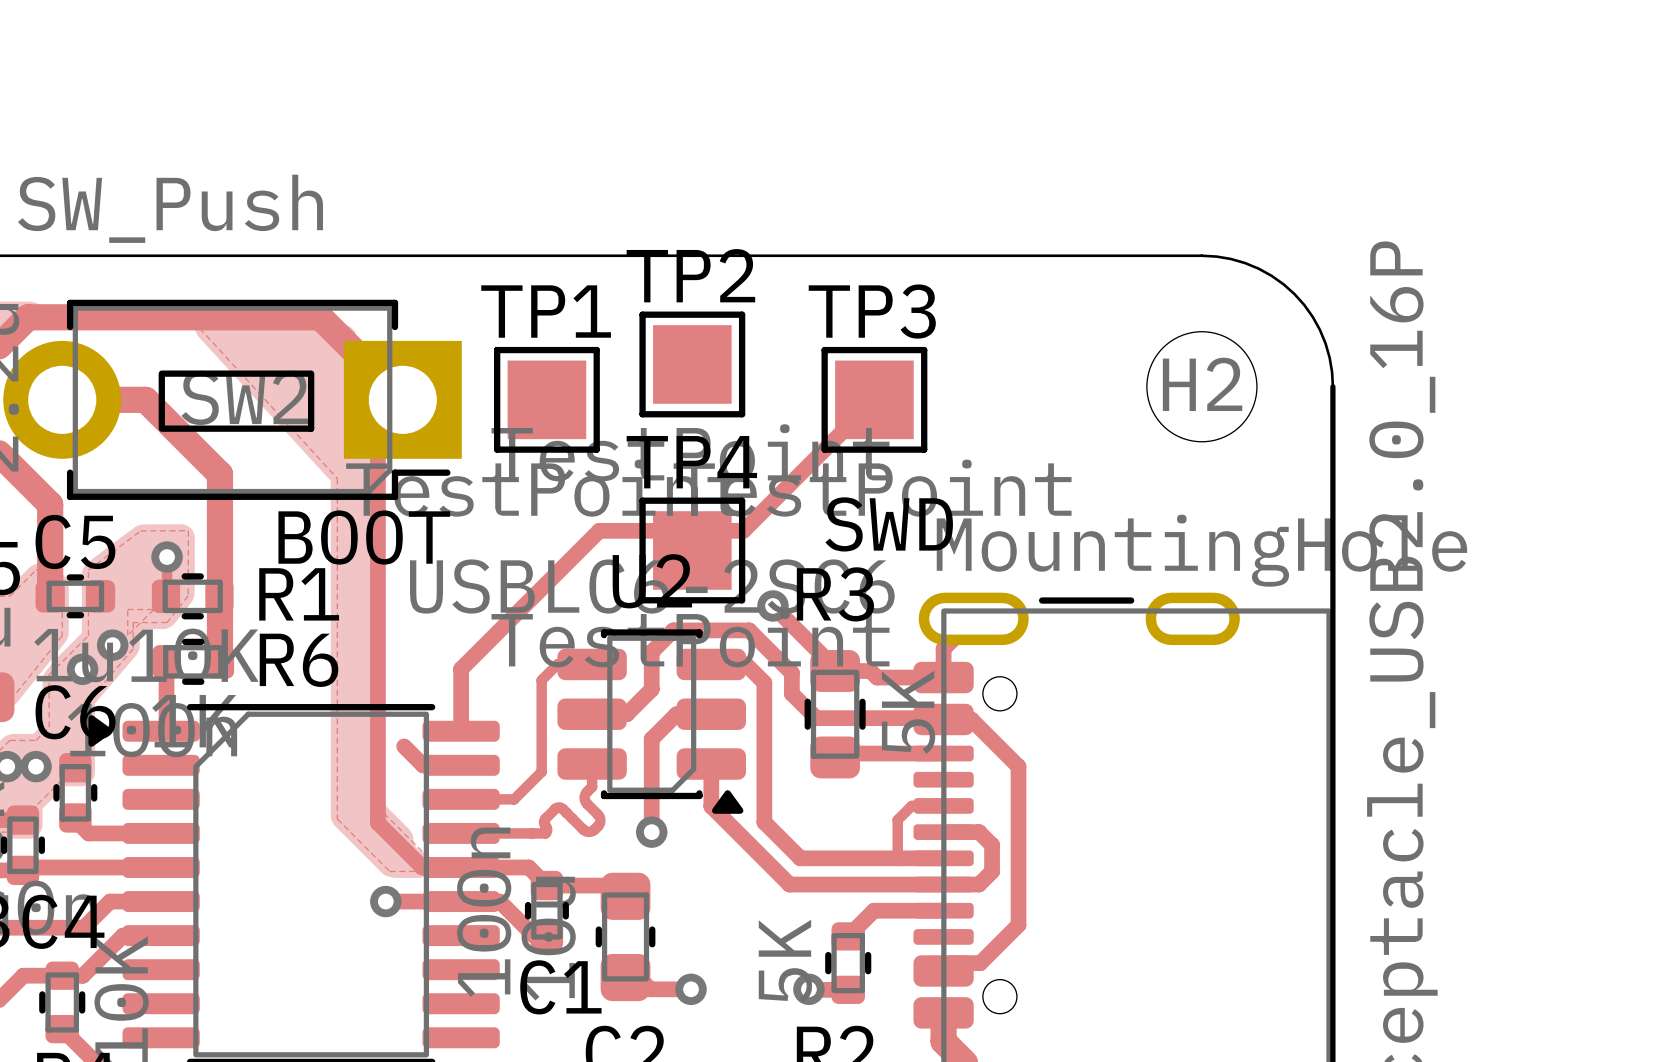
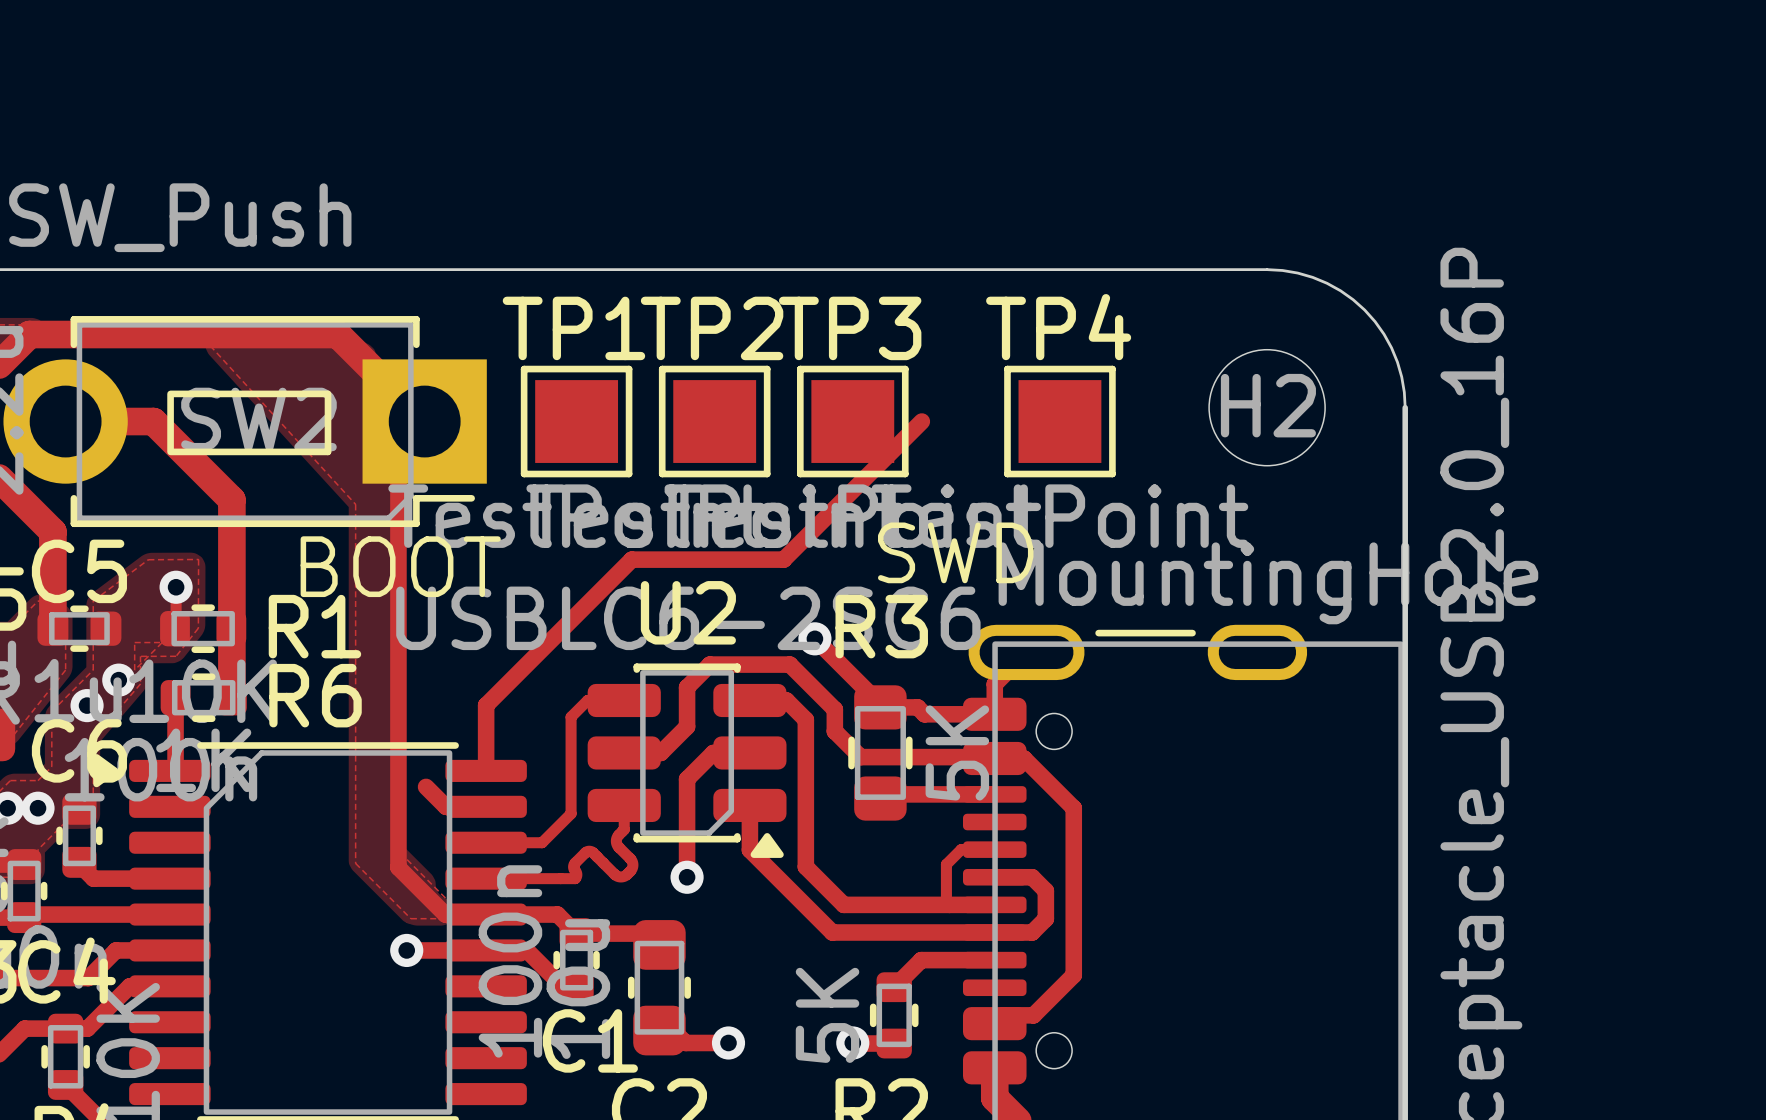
TP2 position: (692, 364) -> (714, 421)
TP3 position: (874, 399) -> (852, 421)
TP4 position: (692, 550) -> (1059, 421)

